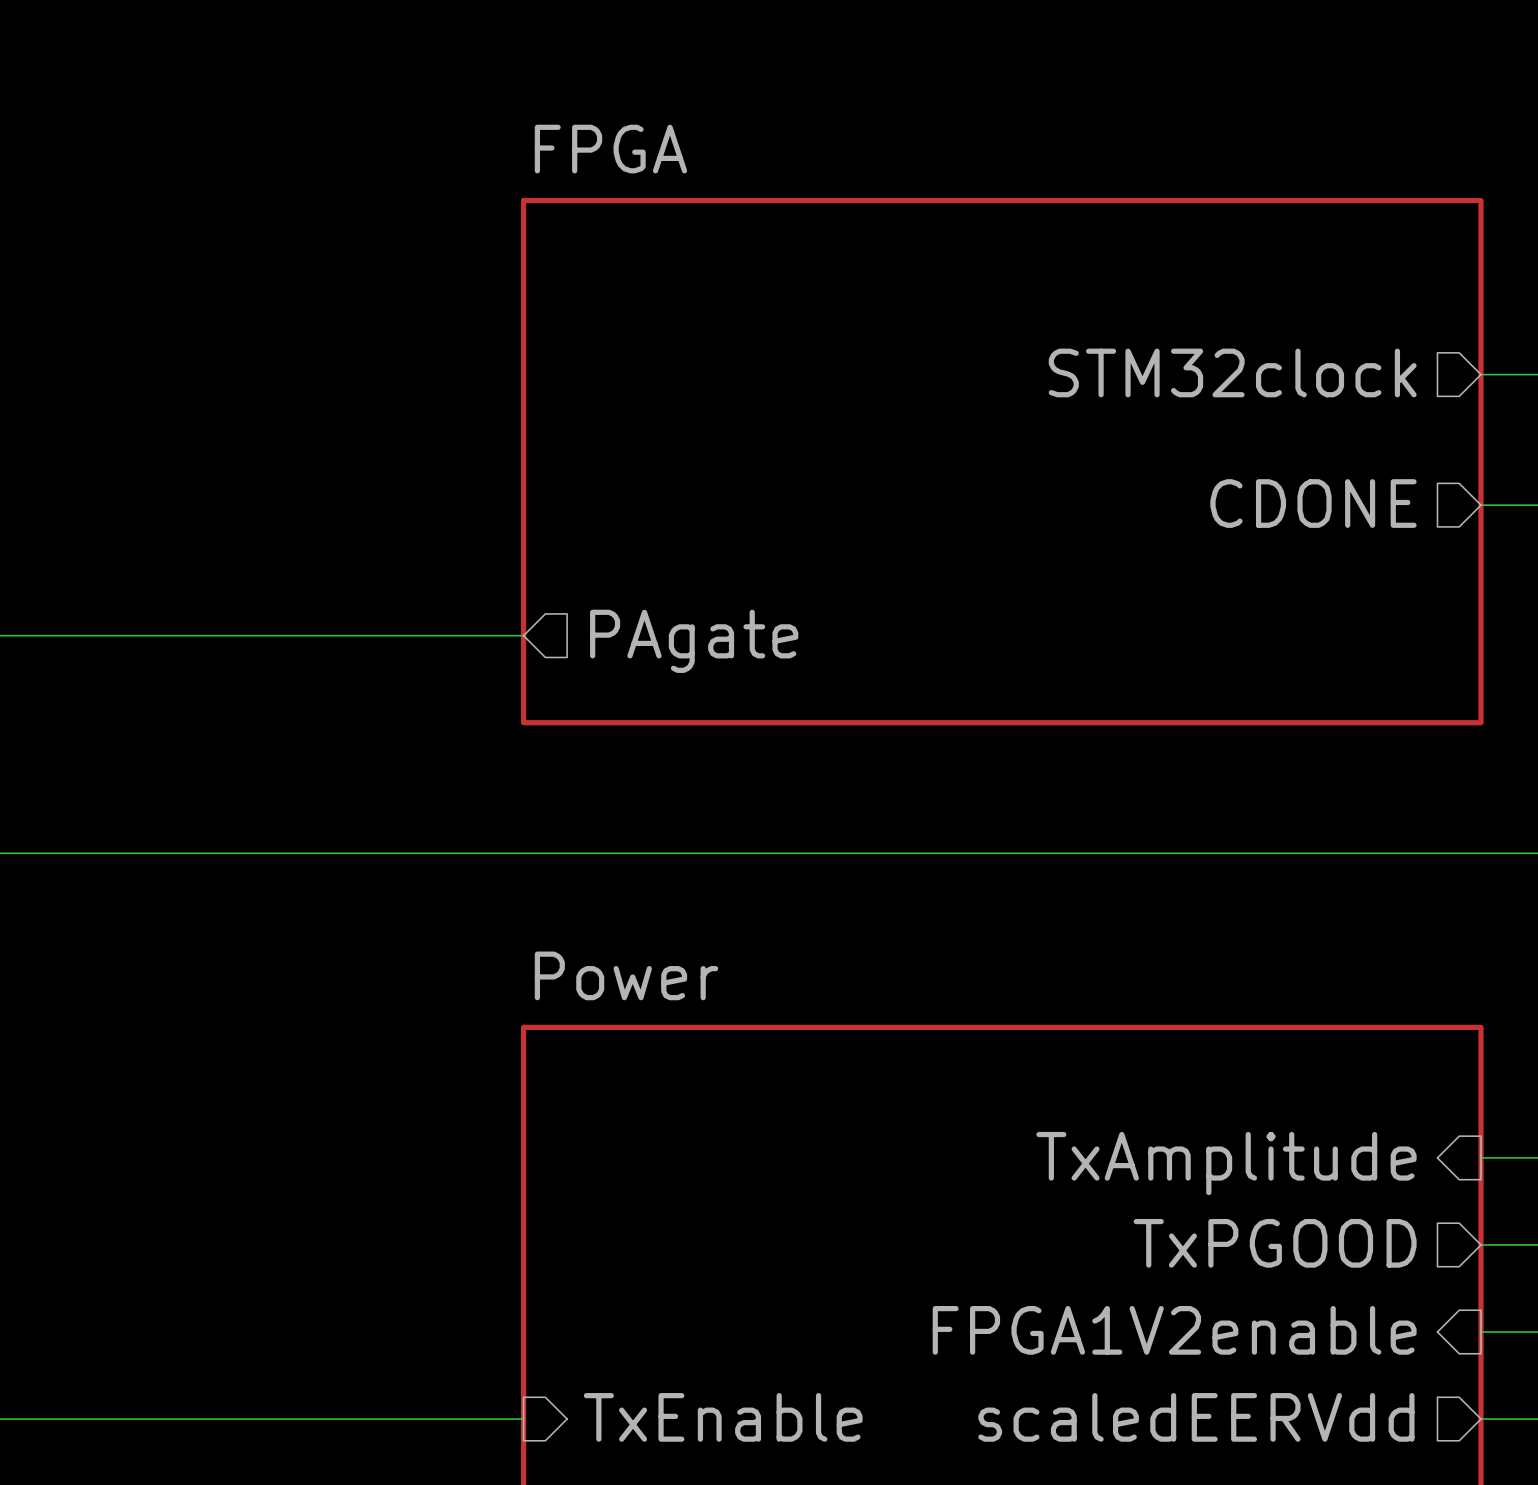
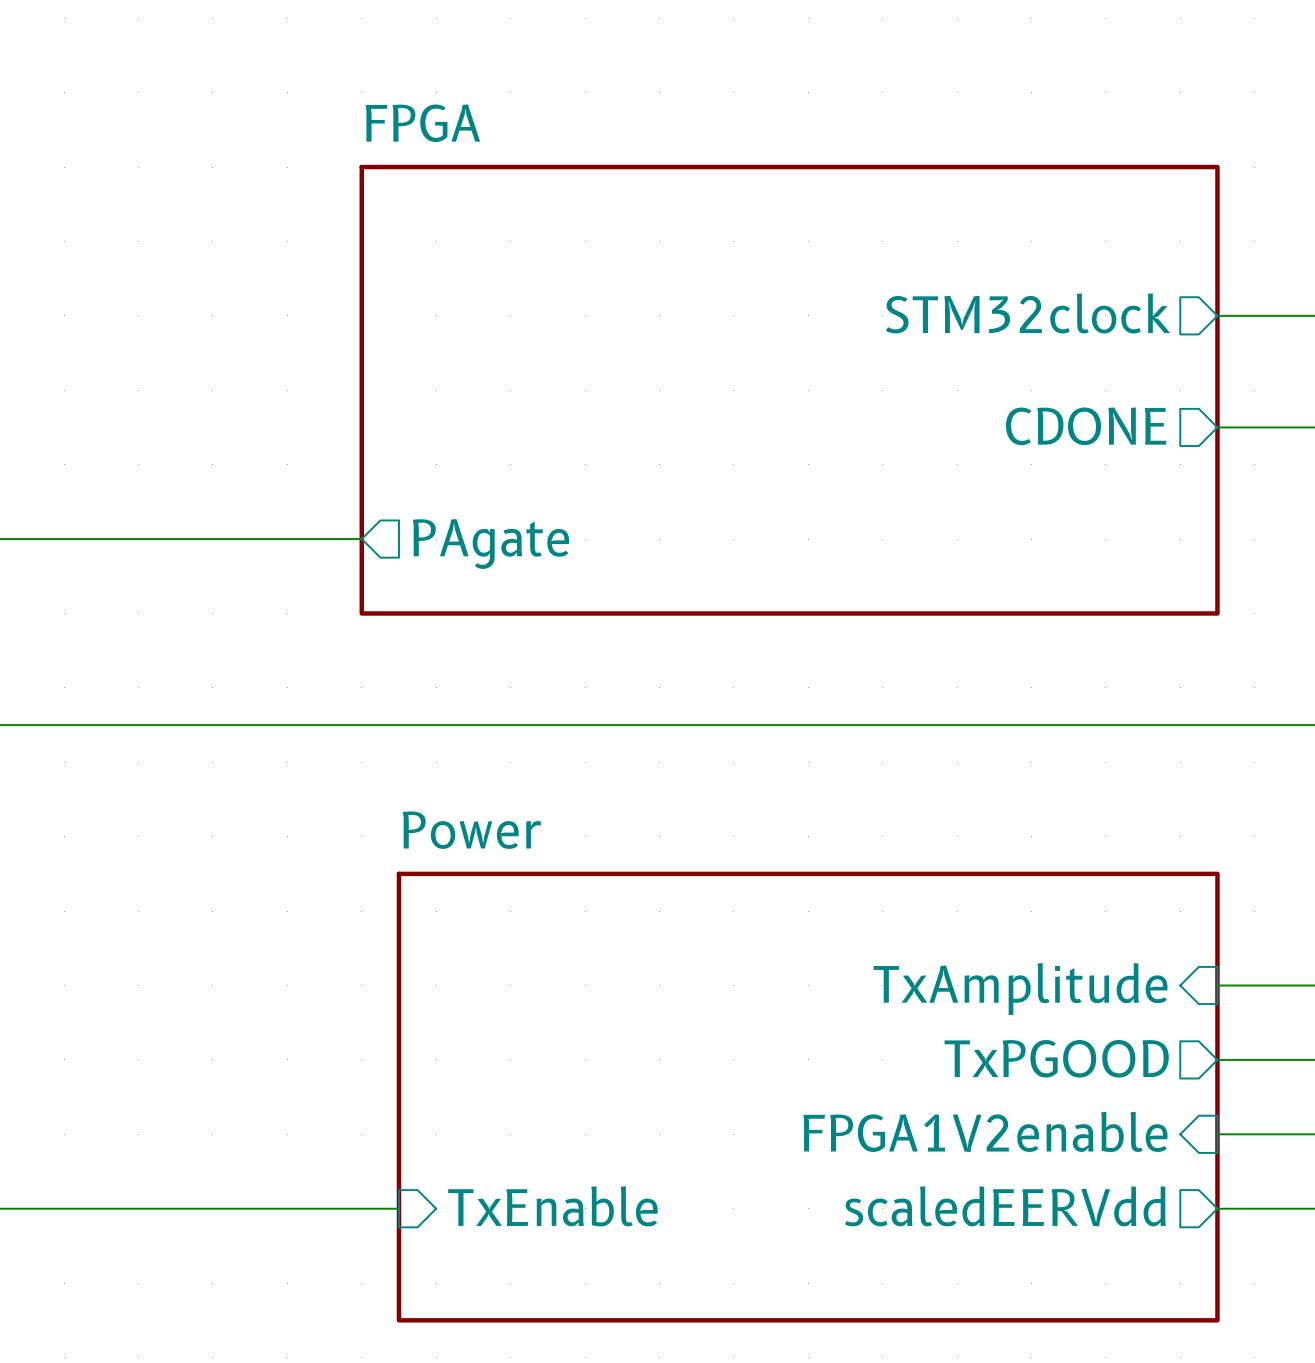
sheet FPGA shape: [520, 197, 1484, 726] -> [359, 164, 1220, 616]
wire: (480, 635) (523, 635) -> none
sheet pin position: PAgate (694, 641) -> PAgate (490, 544)

